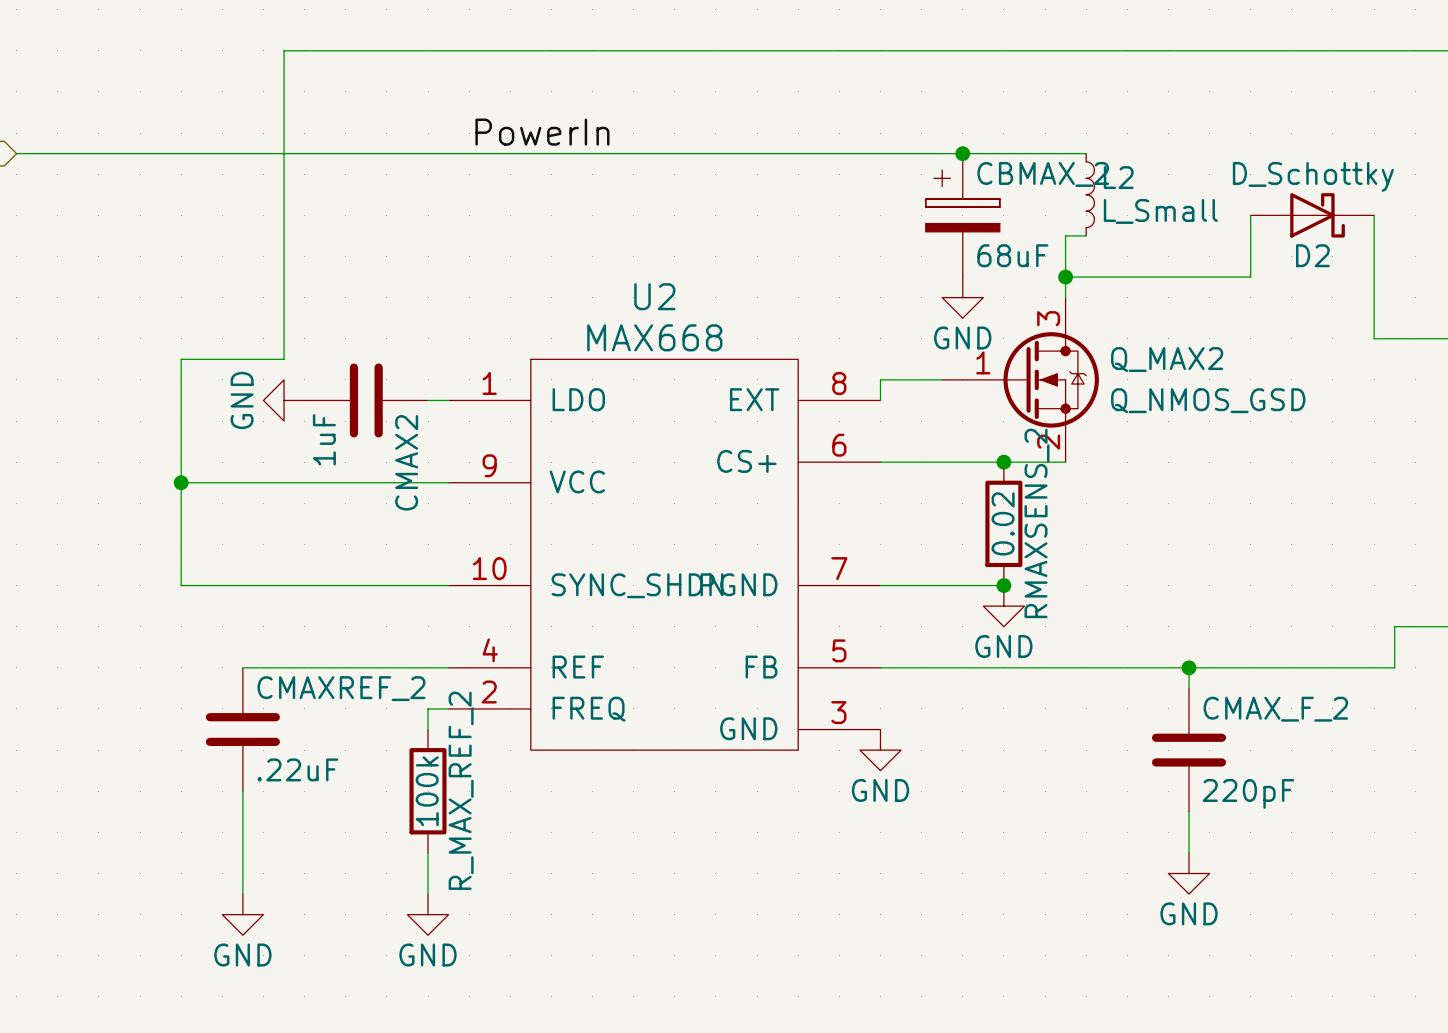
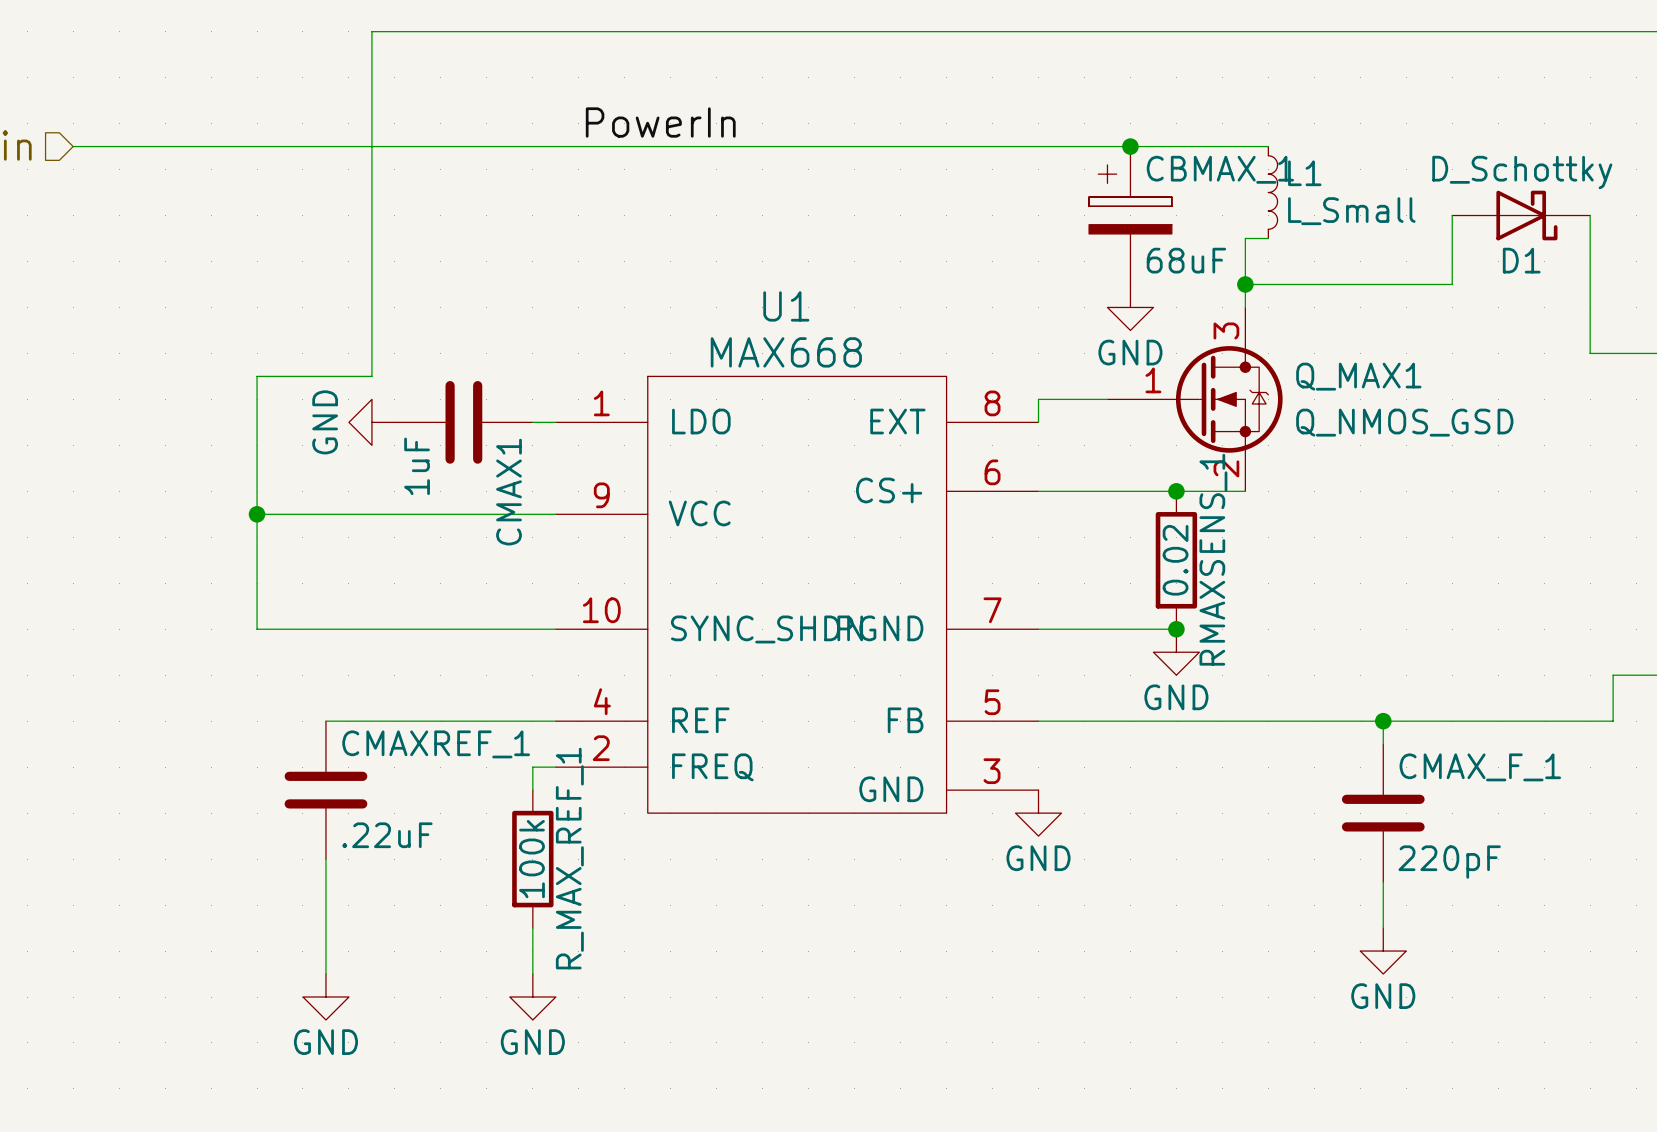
CBMAX_2 name: CBMAX_2 (1043, 174) -> CBMAX_1 (1220, 169)
L2 name: L2 (1118, 177) -> L1 (1304, 173)
D2 name: D2 (1312, 255) -> D1 (1521, 260)
U2 name: U2 (654, 296) -> U1 (786, 306)
Q_MAX2 name: Q_MAX2 (1167, 359) -> Q_MAX1 (1358, 376)
CMAX2 name: CMAX2 (406, 462) -> CMAX1 (509, 492)
RMAXSENS_2 name: RMAXSENS_2 (1037, 523) -> RMAXSENS_1 (1213, 559)
CMAXREF_2 name: CMAXREF_2 (341, 688) -> CMAXREF_1 (436, 744)
CMAX_F_2 name: CMAX_F_2 (1275, 709) -> CMAX_F_1 (1480, 767)
R_MAX_REF_2 name: R_MAX_REF_2 (461, 790) -> R_MAX_REF_1 (569, 858)

